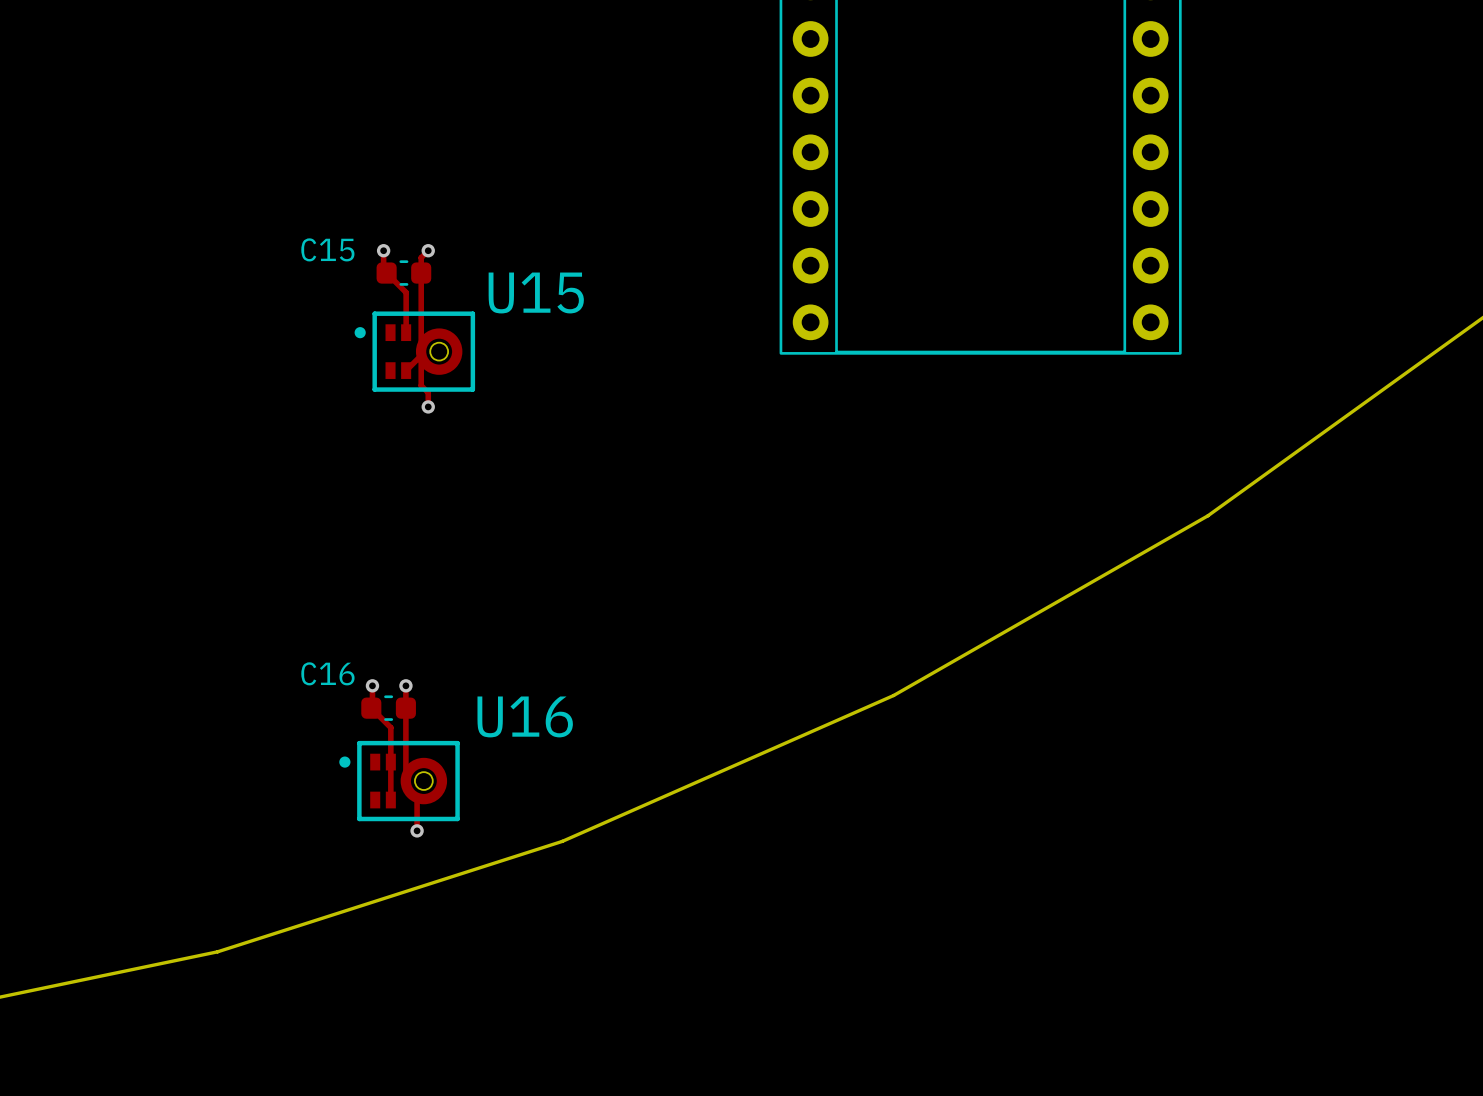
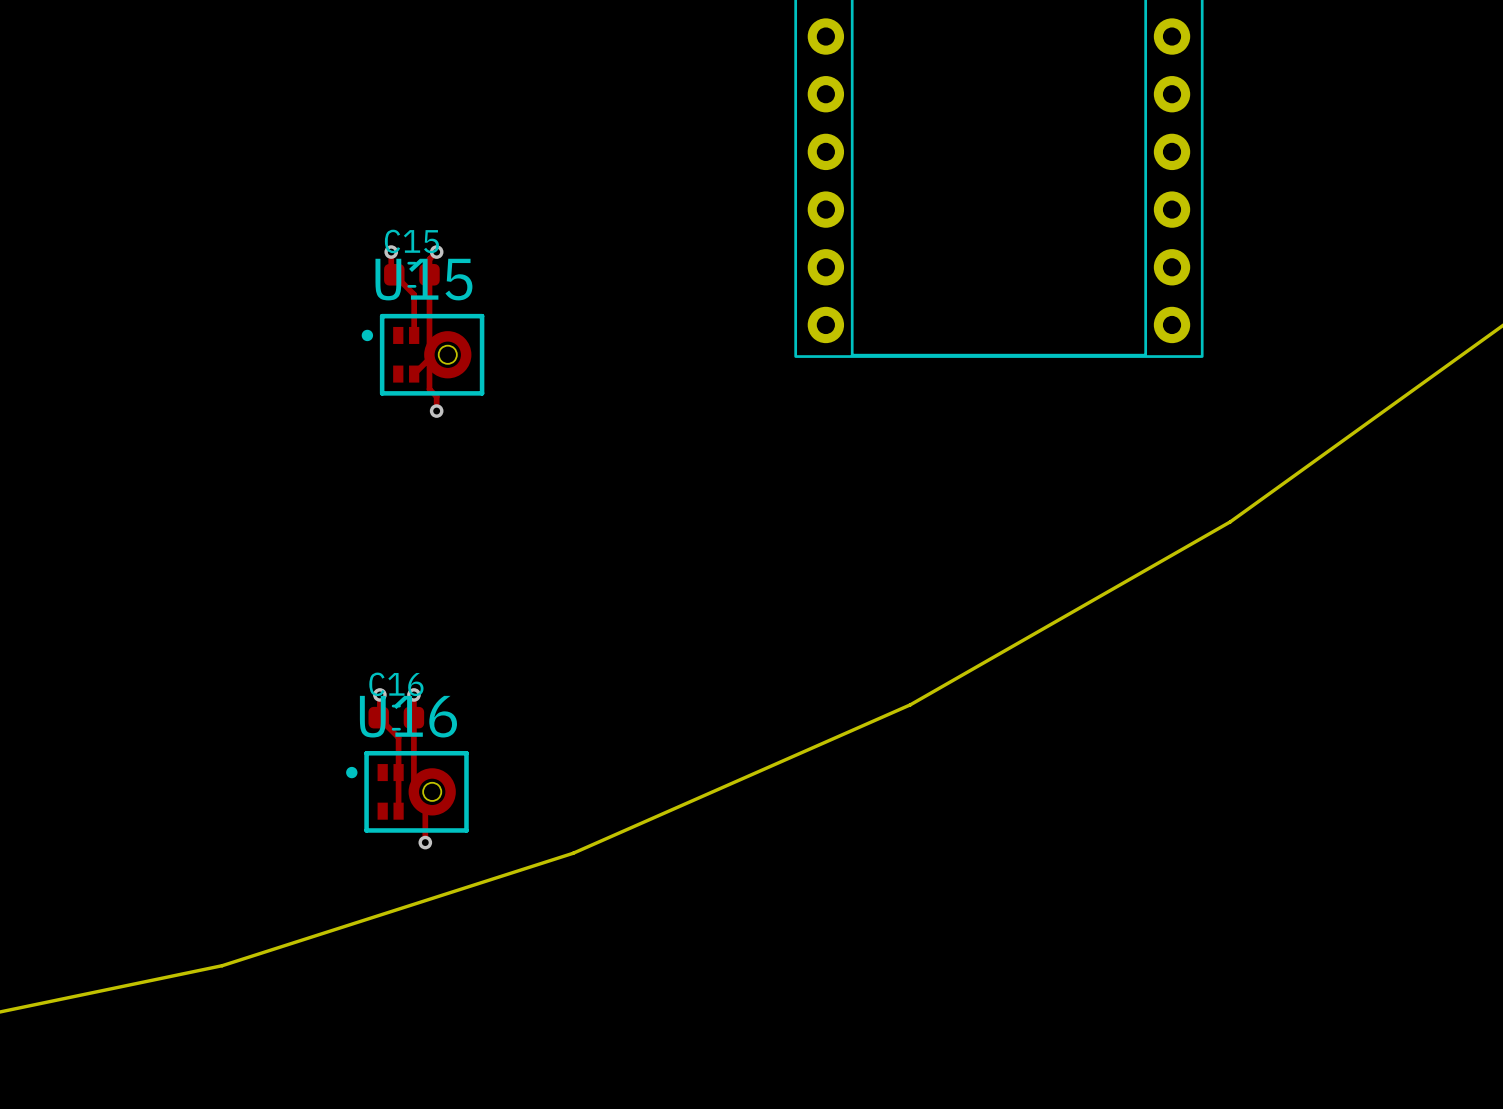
C15 name position: C15 (327, 249) -> C15 (411, 241)
U15 name position: U15 (536, 292) -> U15 (423, 279)
C16 name position: C16 (327, 673) -> C16 (396, 684)
U16 name position: U16 (525, 716) -> U16 (408, 716)

